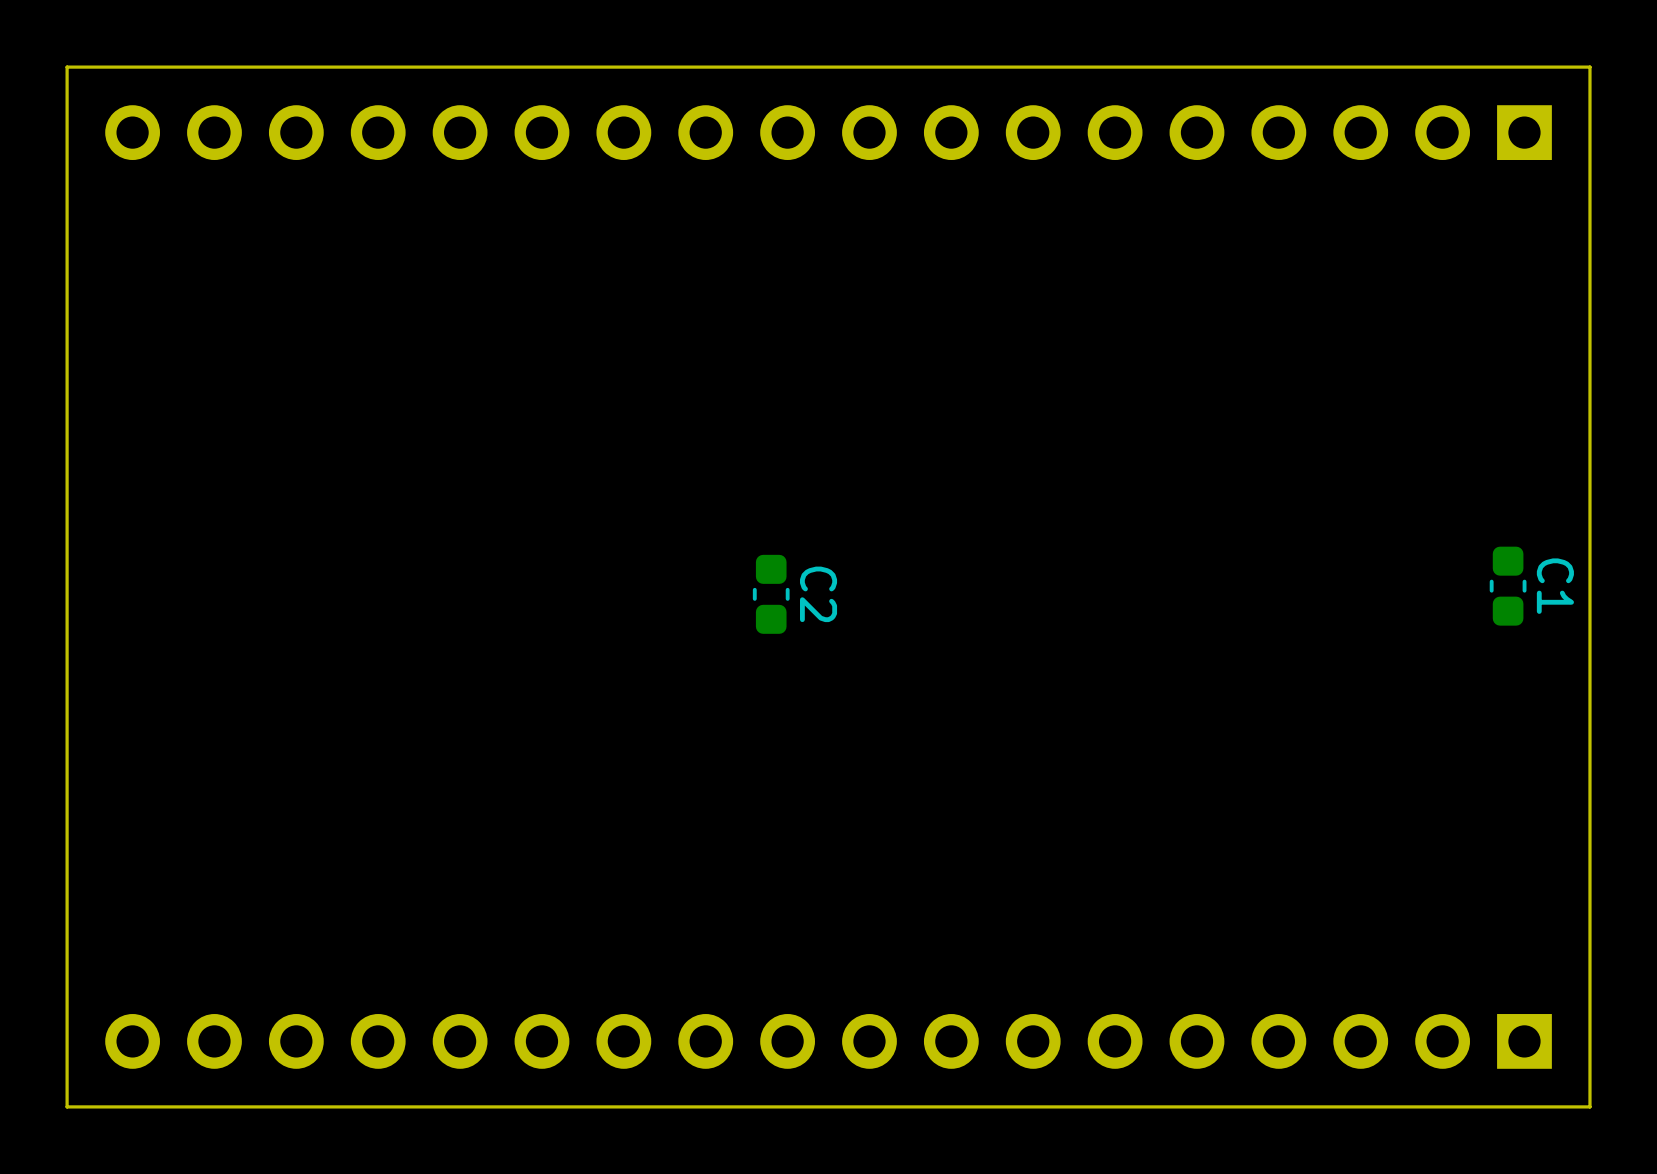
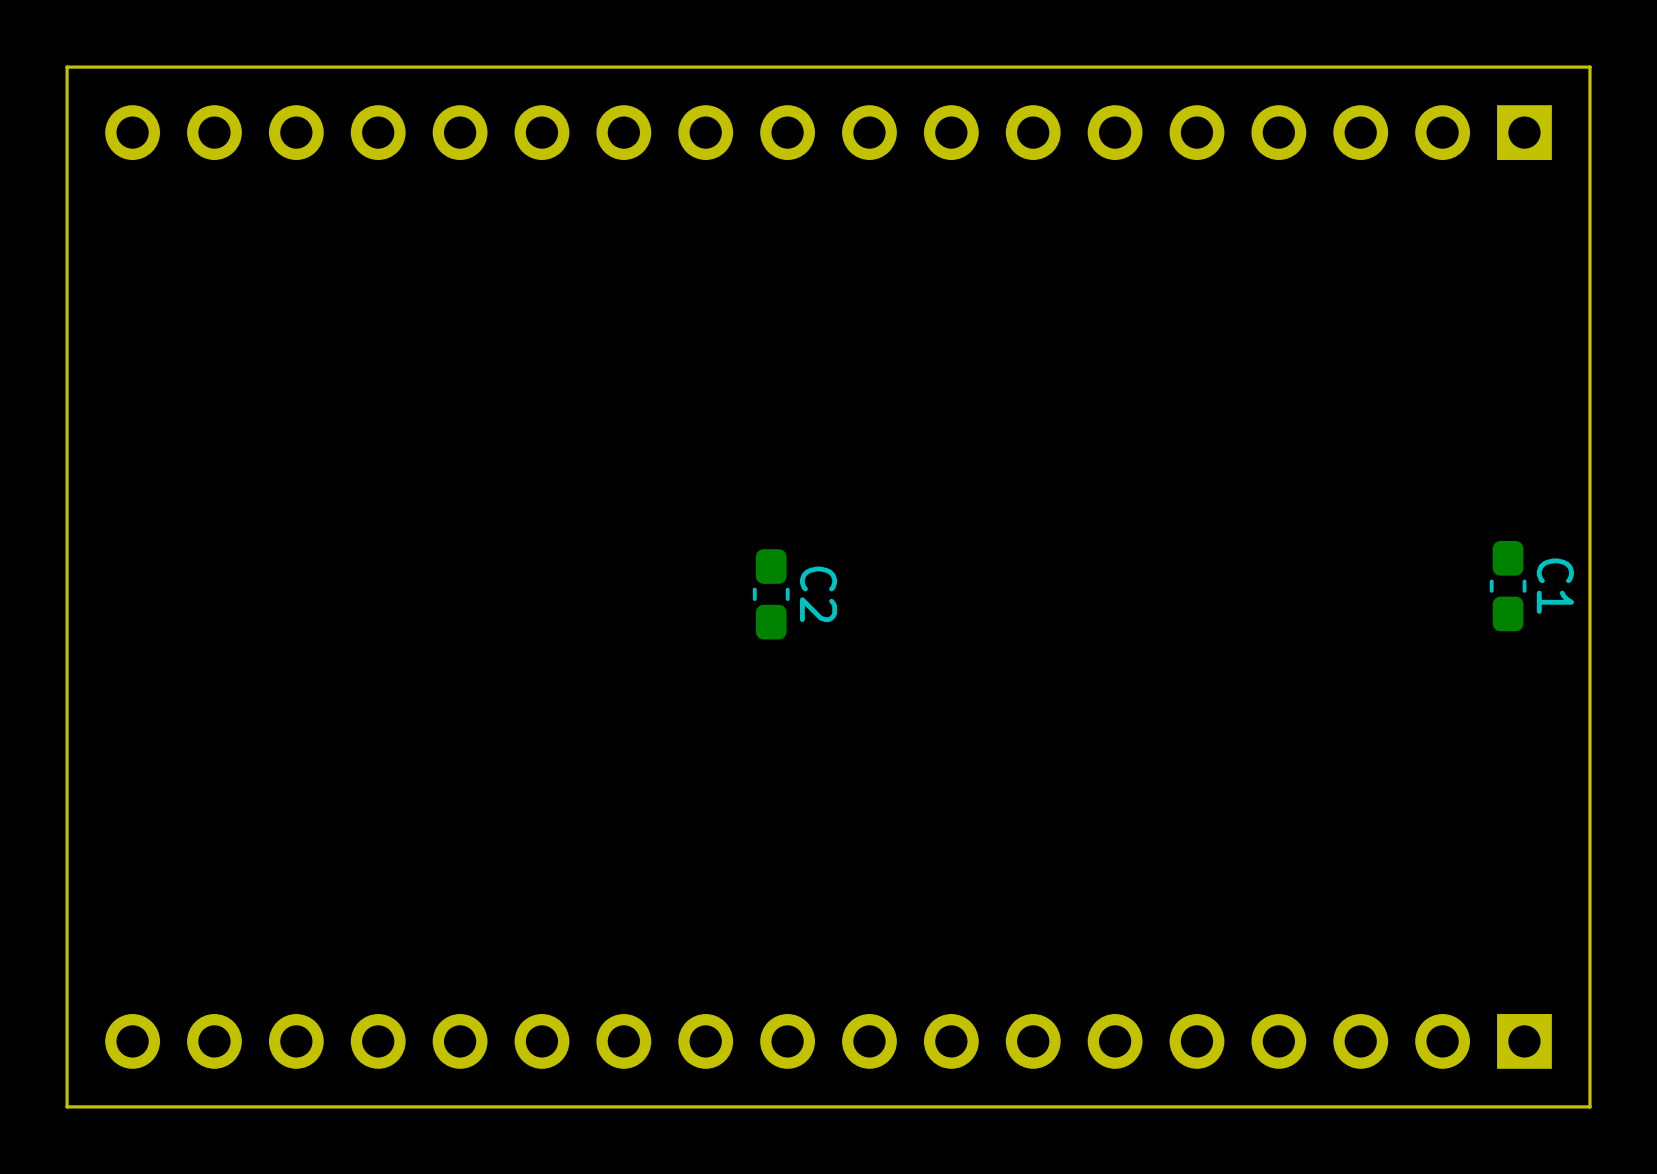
C1 footprint: [1489, 546, 1527, 626] -> [1489, 541, 1527, 632]
C2 footprint: [752, 554, 790, 634] -> [752, 549, 790, 640]

